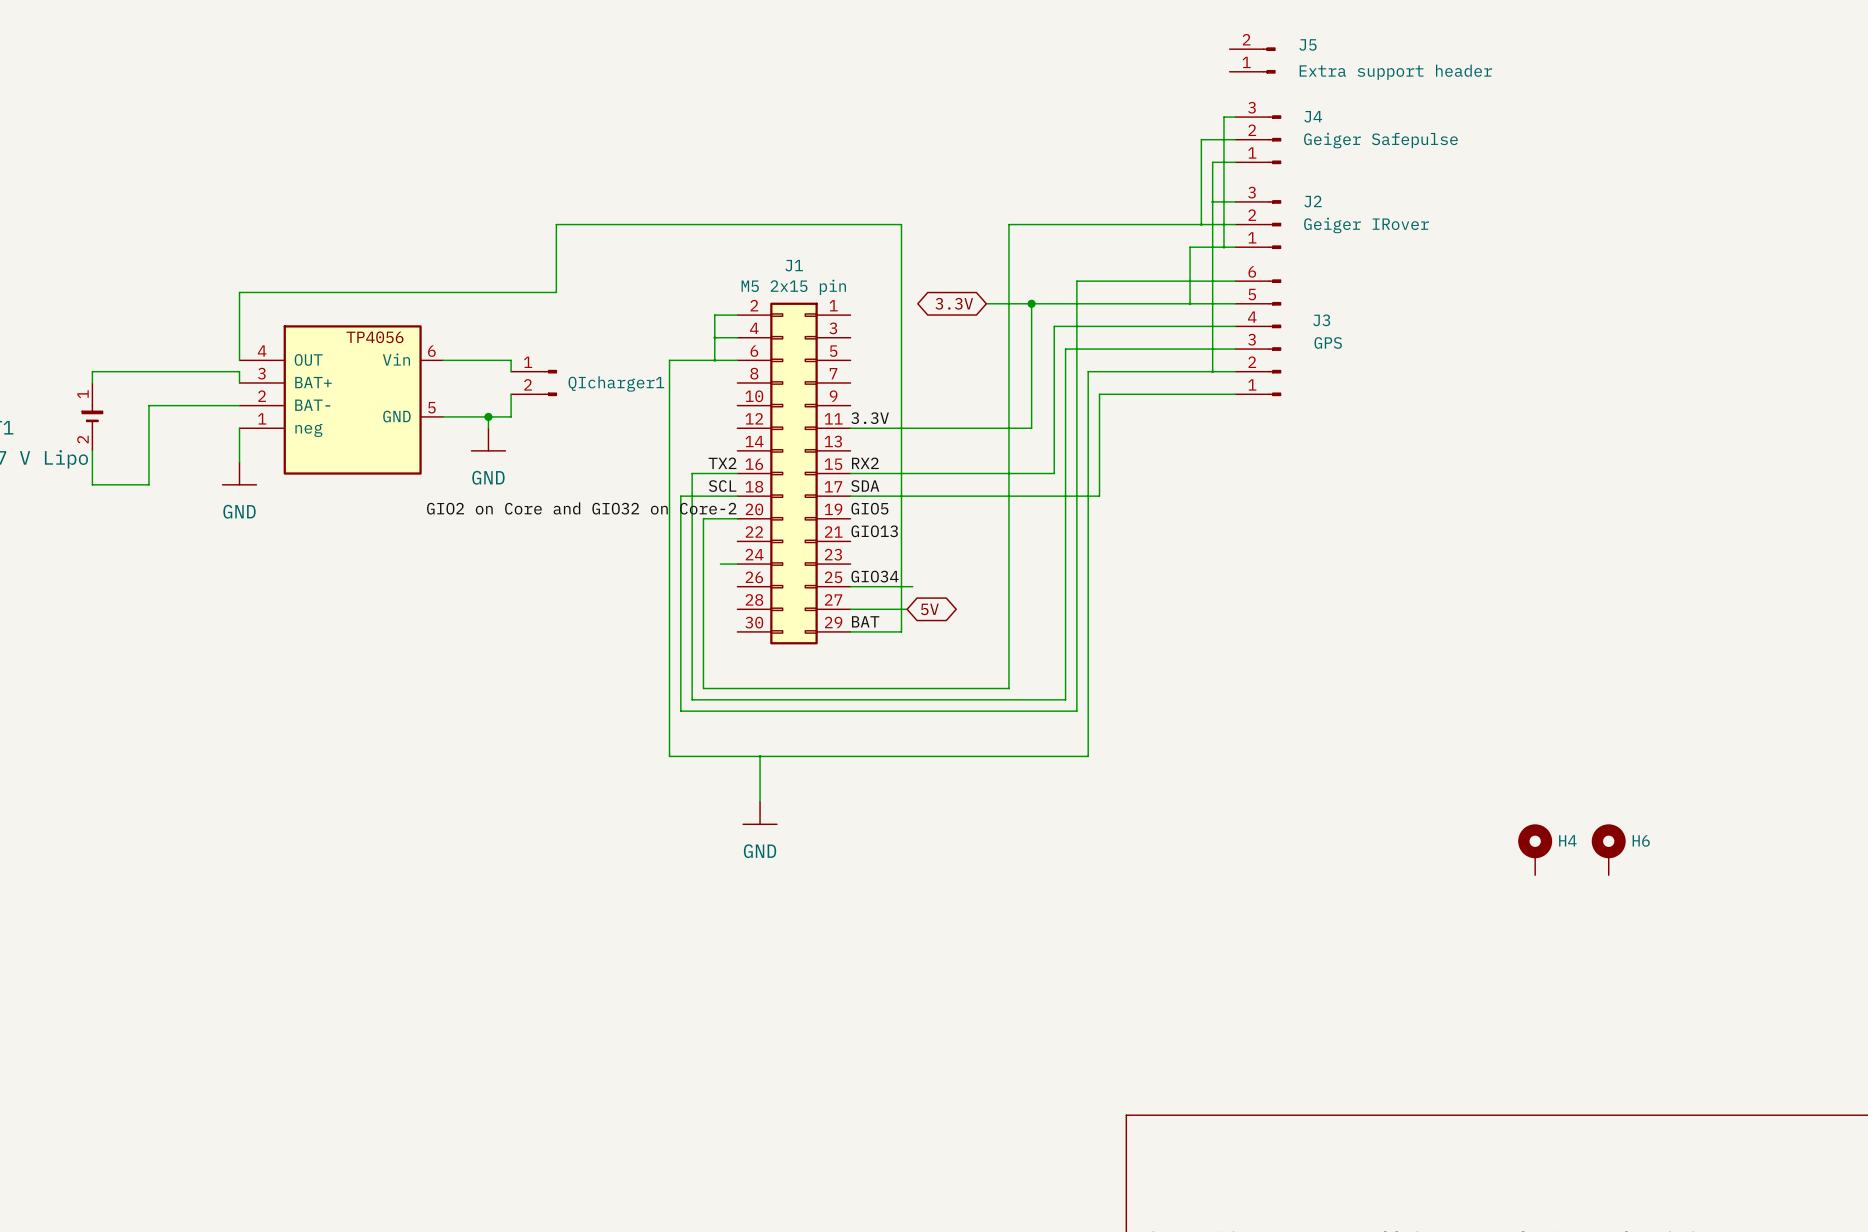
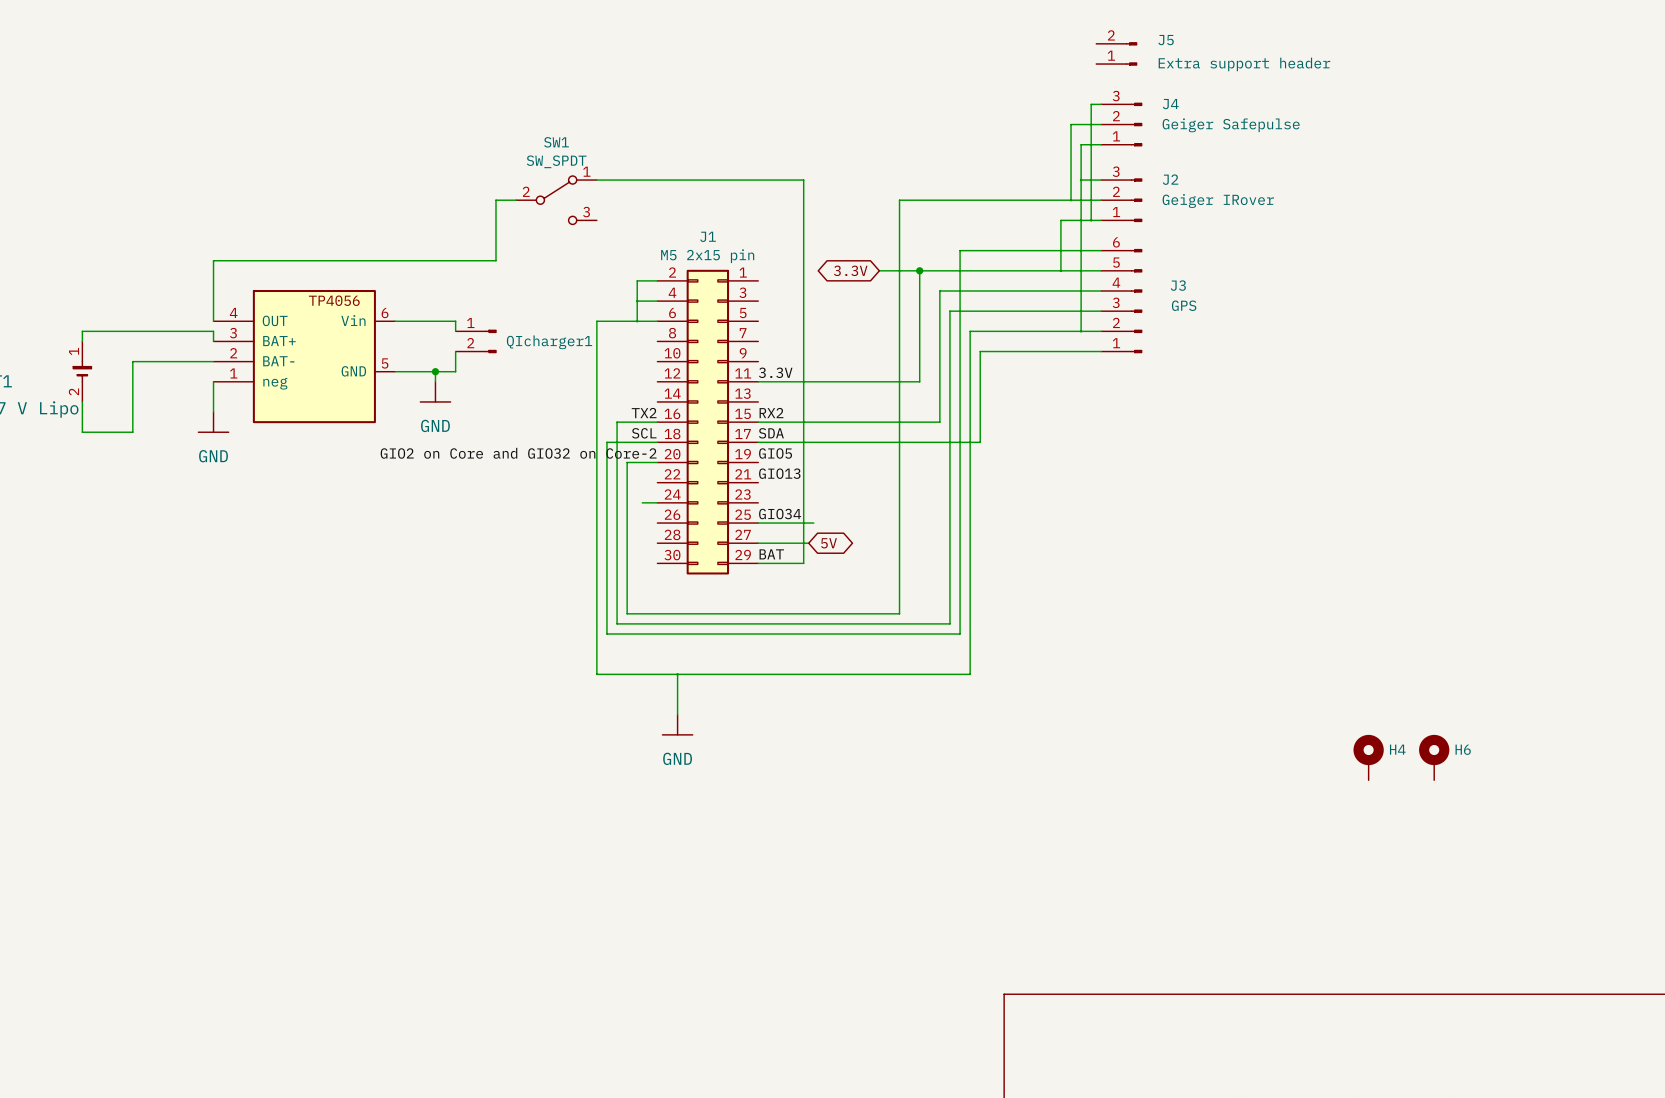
wire: (578, 224) (901, 224) -> (596, 180) (803, 180) (803, 200)
SW1: none -> SW_SPDT (556, 200)

